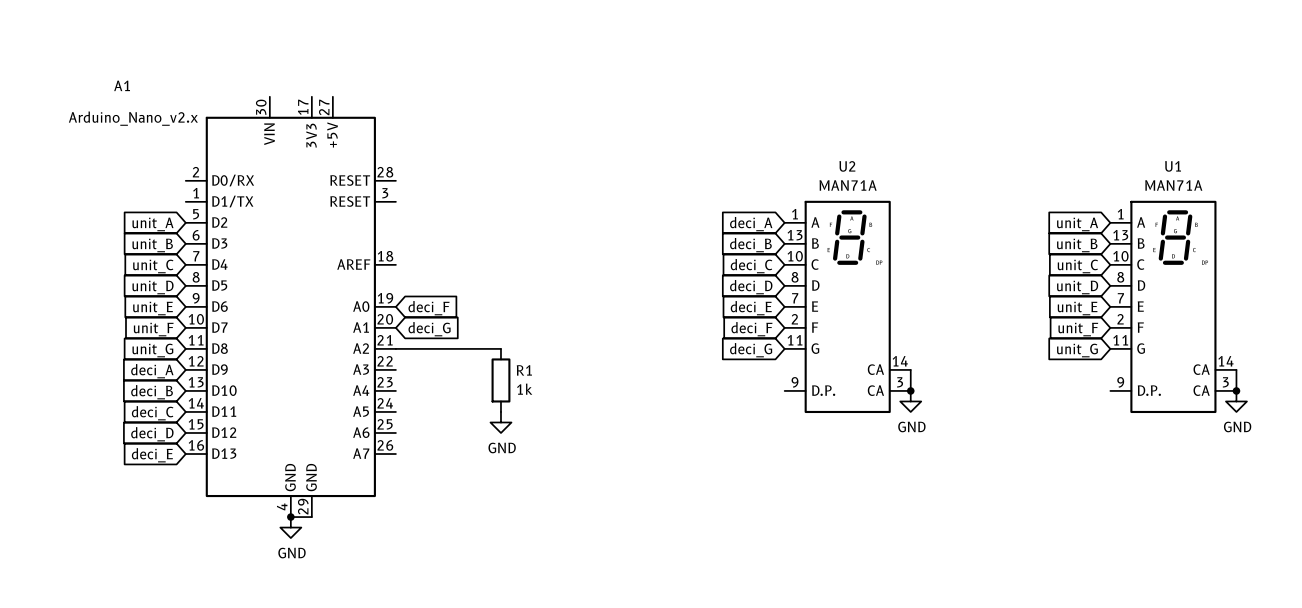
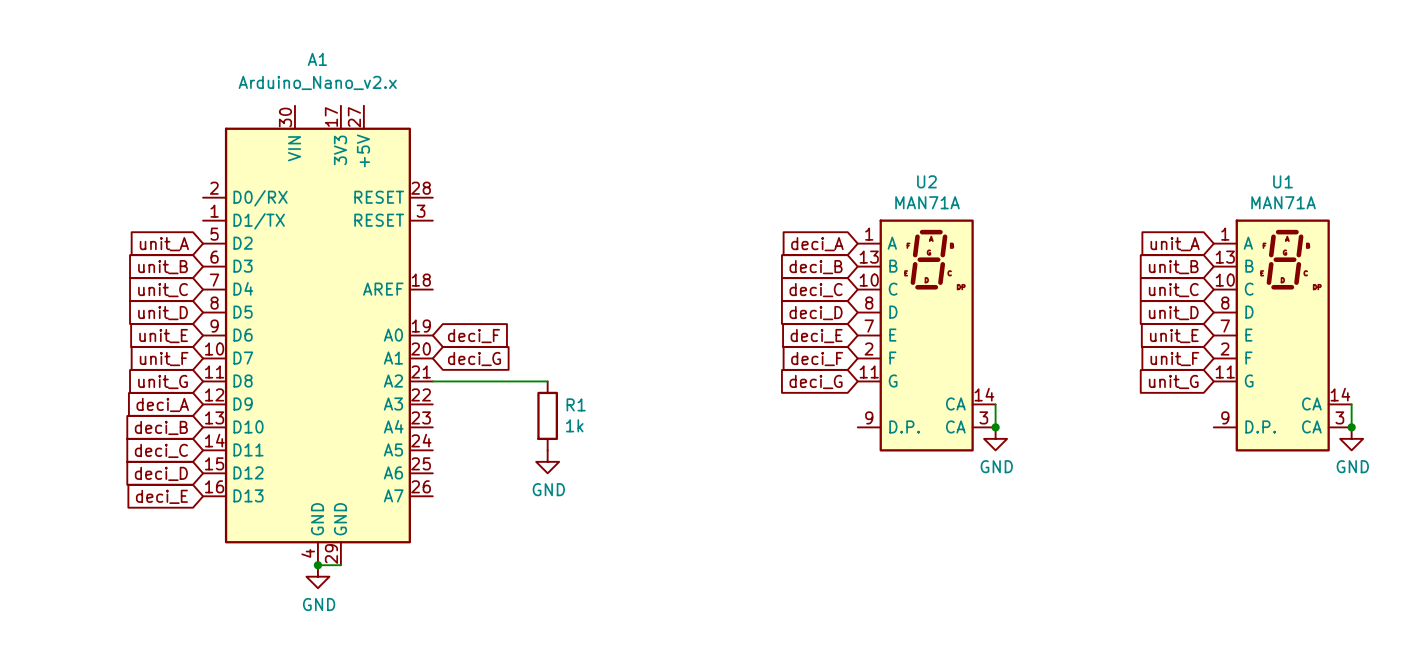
A1 name position: A1 (122, 85) -> A1 (317, 59)
A1 value position: Arduino_Nano_v2.x (133, 118) -> Arduino_Nano_v2.x (317, 82)

